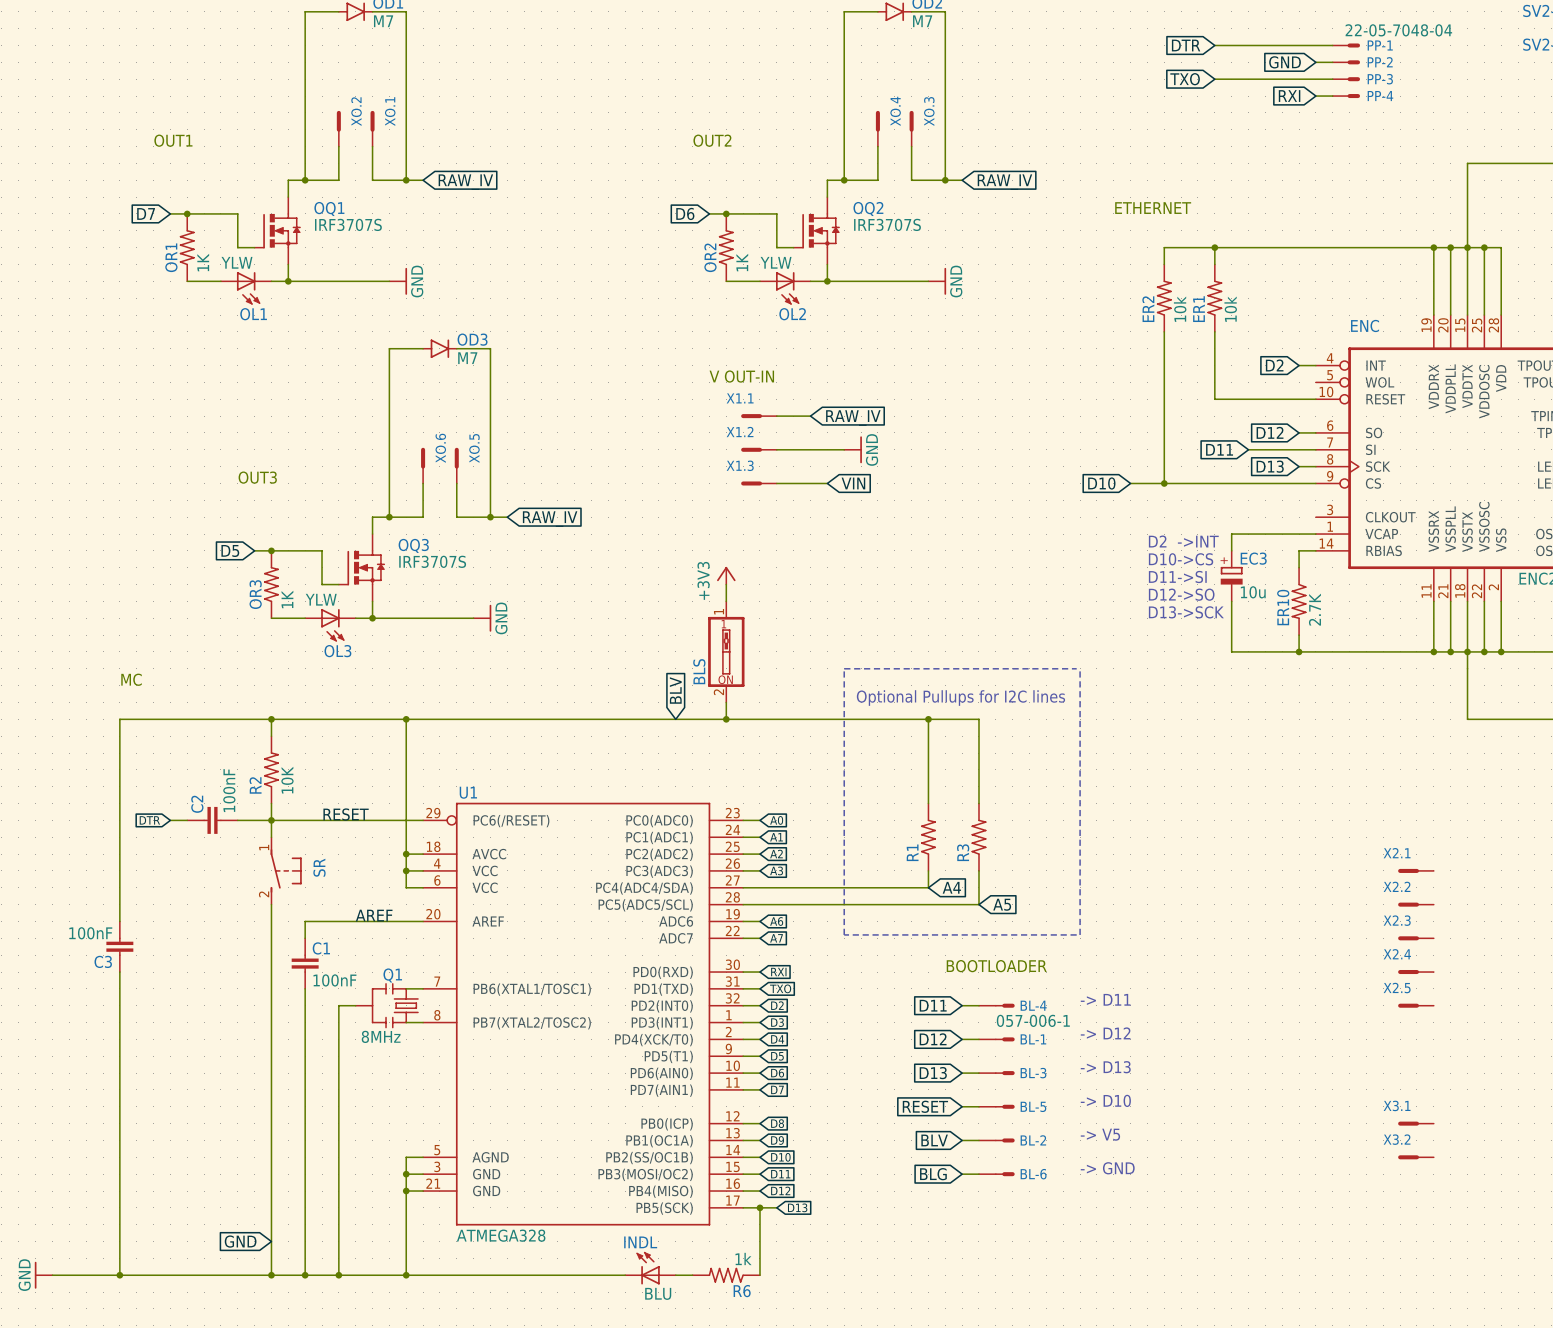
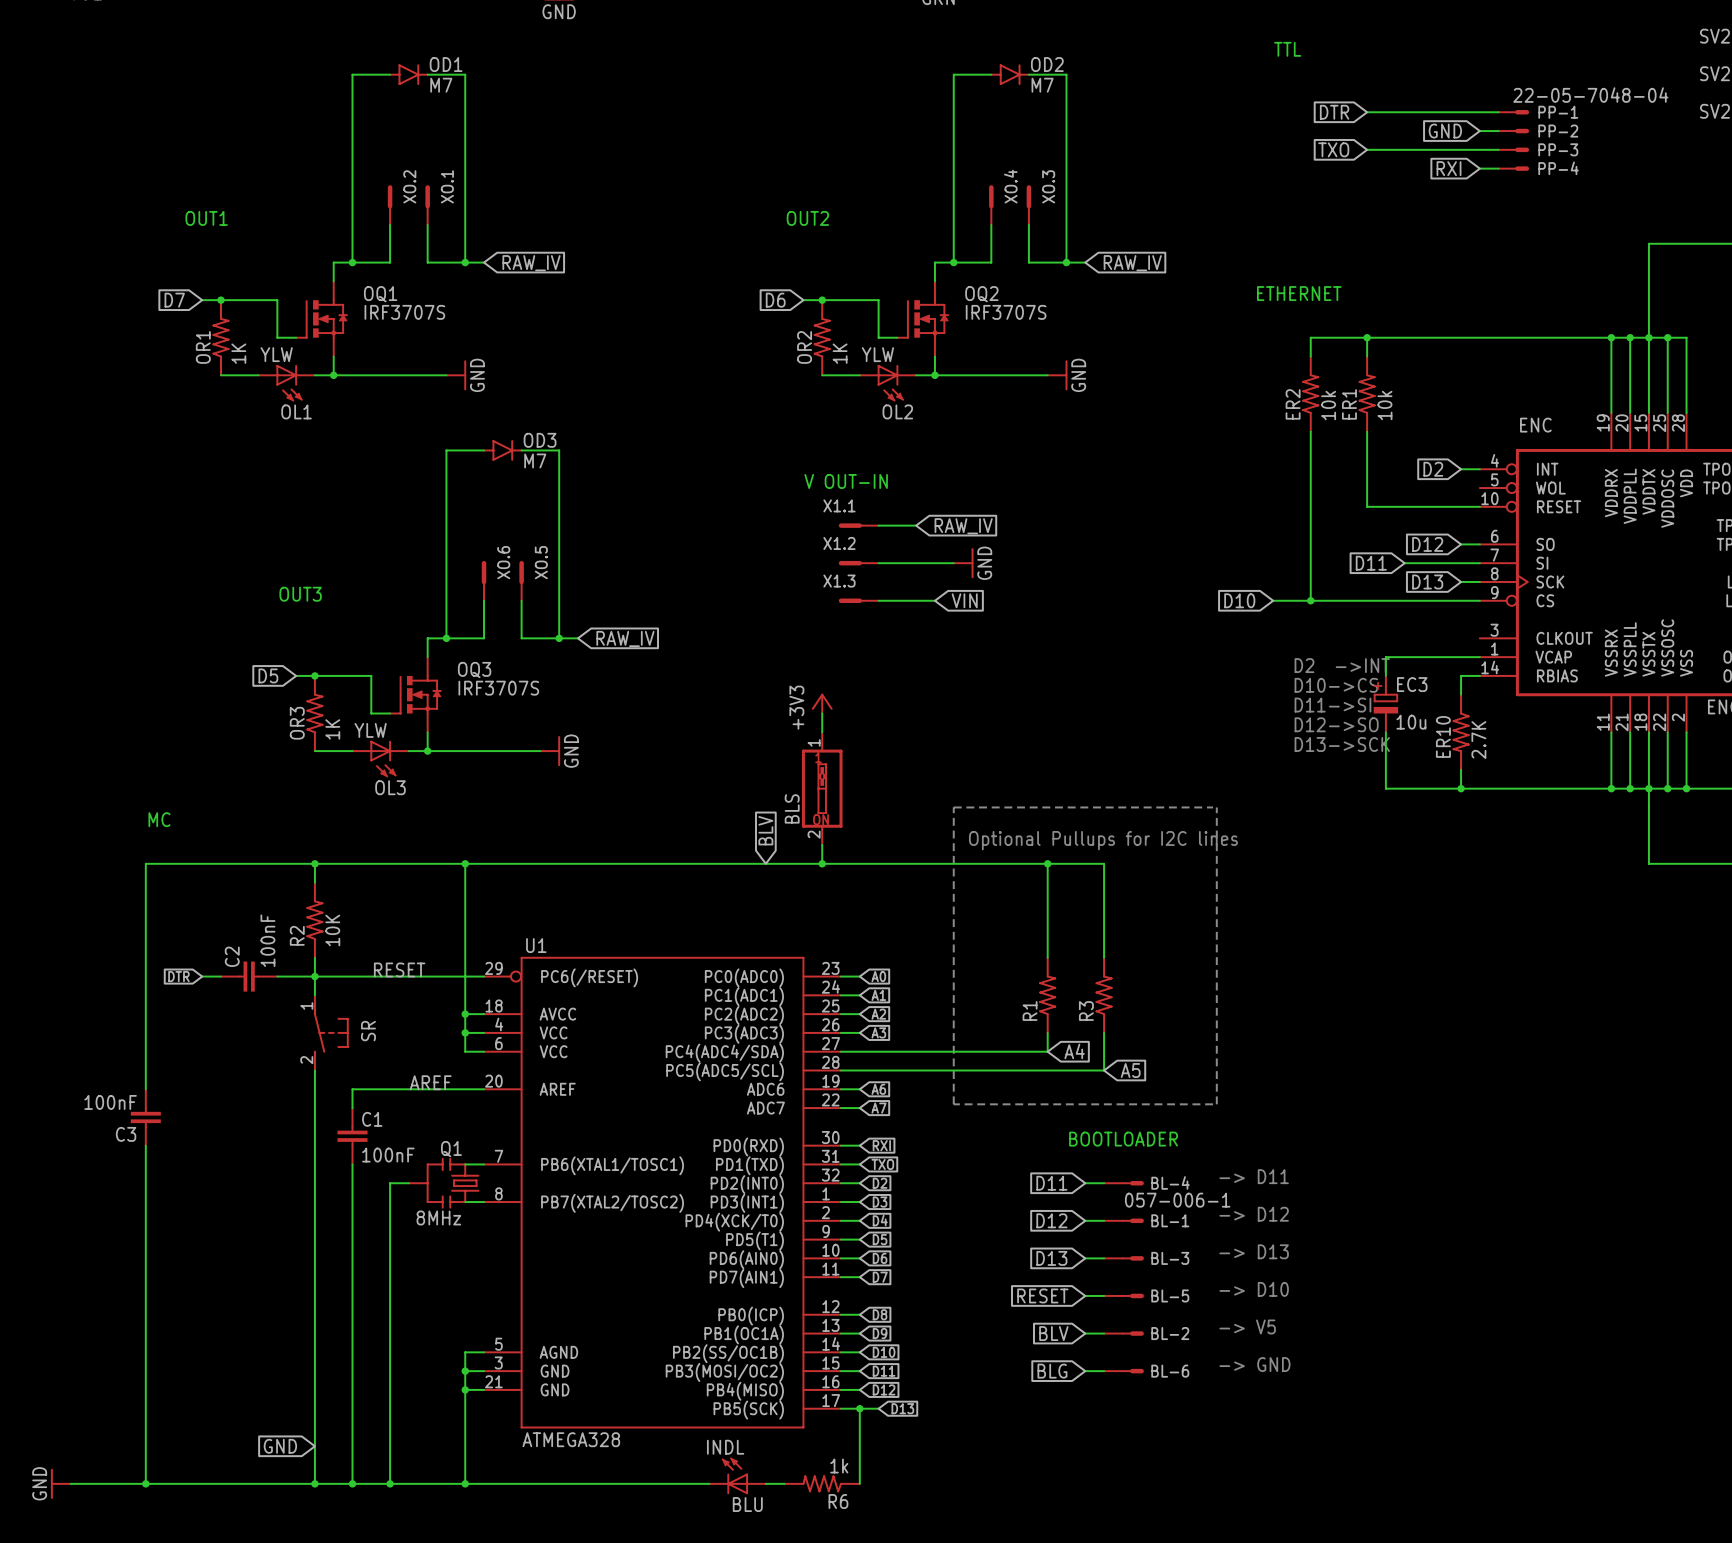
X2.1: (1415, 870) -> none
X2.2: (1415, 904) -> none
X2.3: (1415, 938) -> none
X2.4: (1415, 972) -> none
X2.5: (1415, 1005) -> none
X3.1: (1415, 1123) -> none
X3.2: (1415, 1157) -> none

